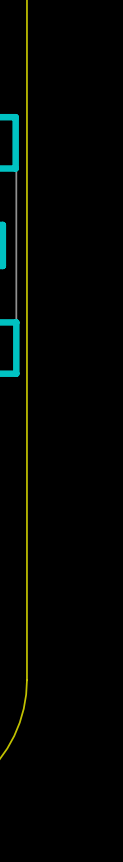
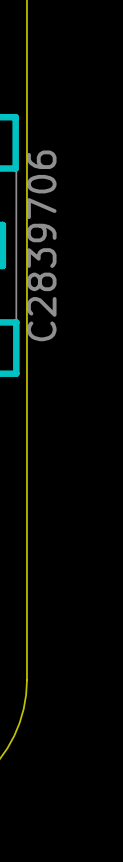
part value: none -> C2839706 (41, 245)

